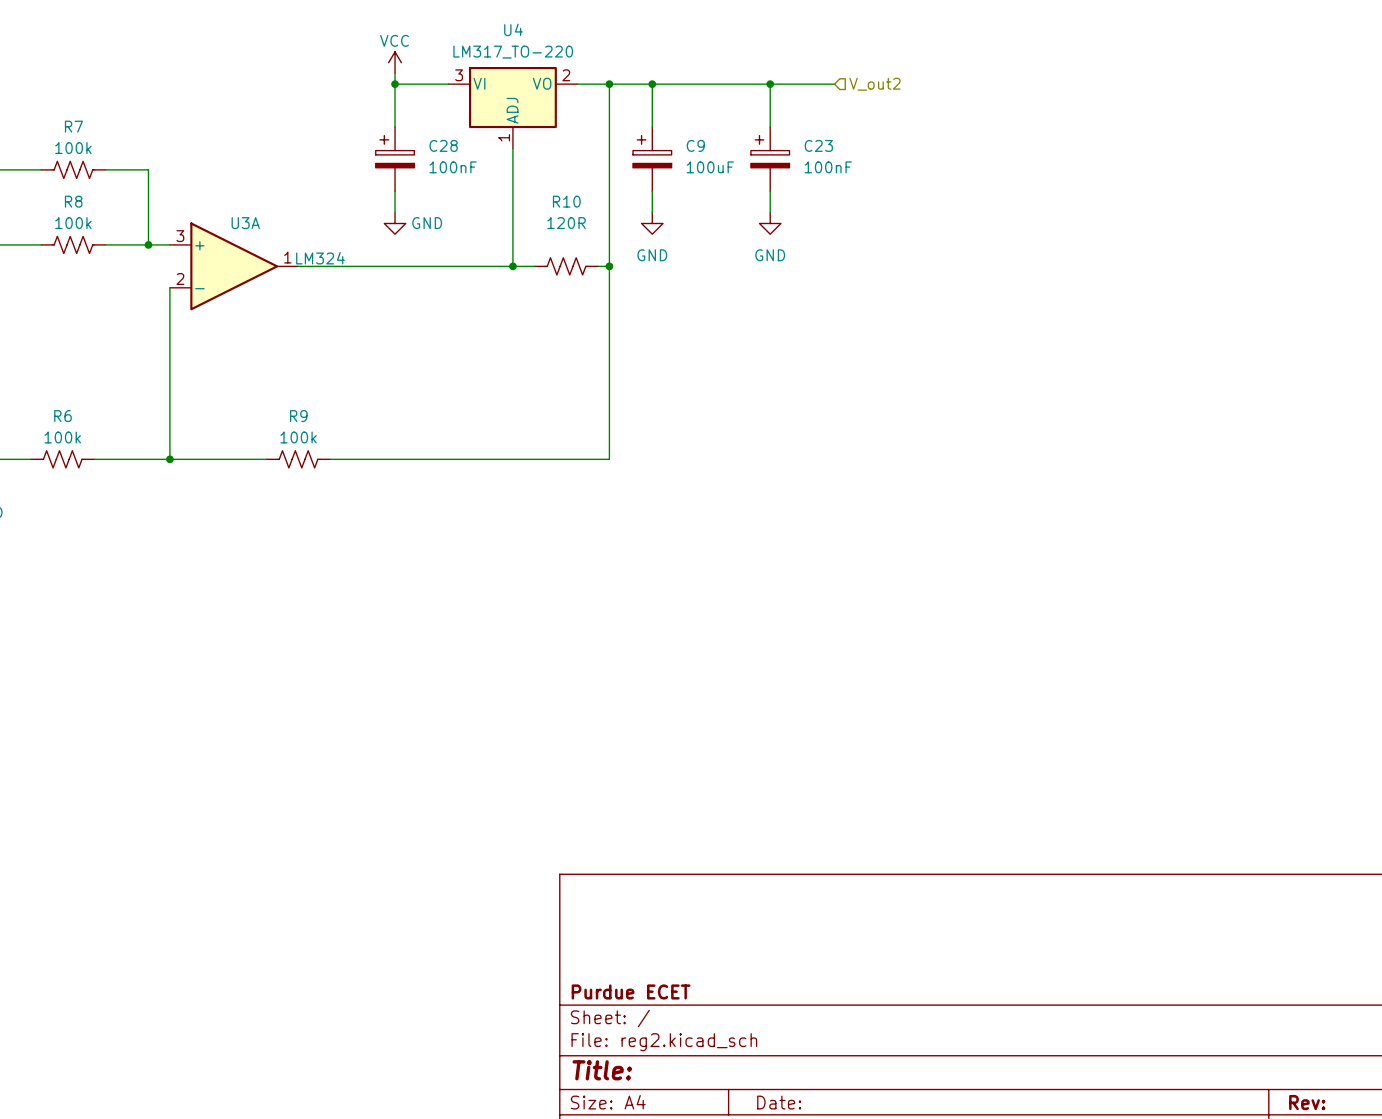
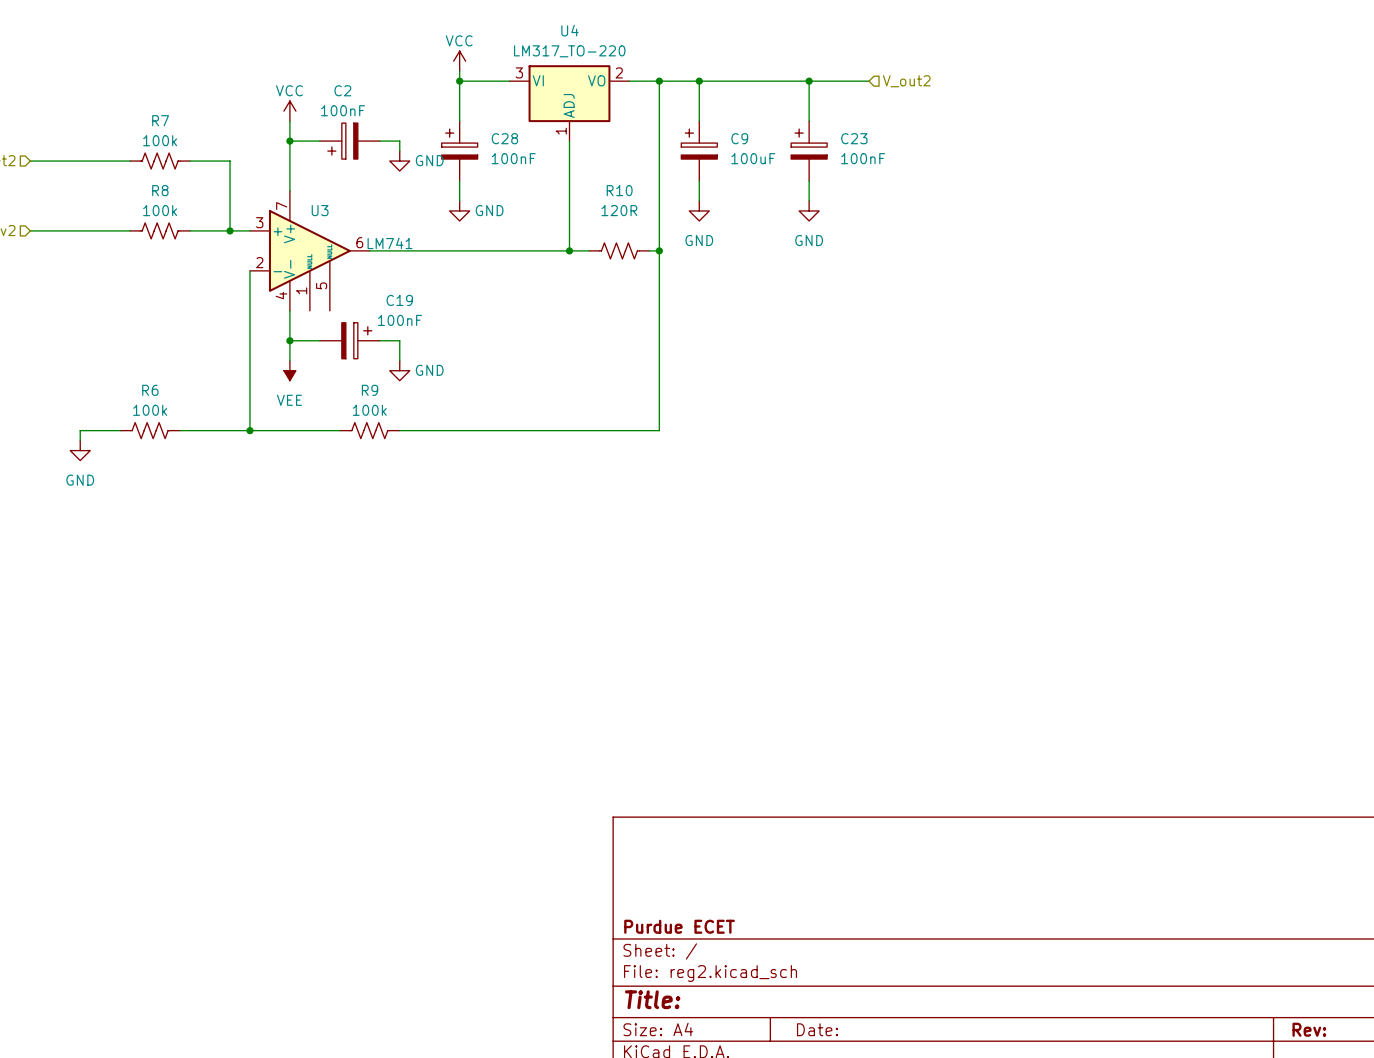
power symbol: none -> VCC (289, 111)
wire: none -> (289, 121) (289, 191)
wire: none -> (289, 141) (319, 141)
junction: none -> (289, 141)
C2: none -> 100nF (349, 141)
wire: none -> (379, 141) (399, 141) (399, 151)
power symbol: none -> GND (399, 161)
U3A: LM324 (234, 266) -> none
U3: none -> LM741 (309, 250)
wire: none -> (289, 310) (289, 360)
wire: none -> (289, 340) (319, 340)
junction: none -> (289, 340)
C19: none -> 100nF (349, 340)
wire: none -> (379, 340) (399, 340) (399, 360)
power symbol: none -> VEE (289, 370)
power symbol: none -> GND (399, 370)

